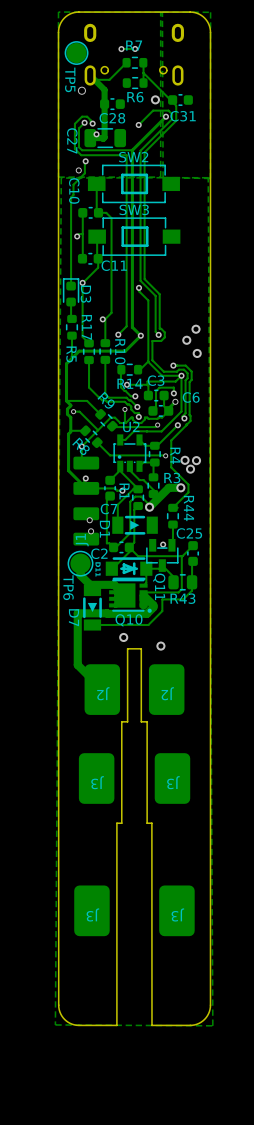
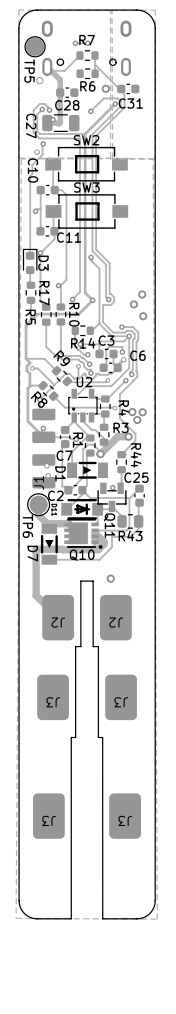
via: (123, 637) -> none

